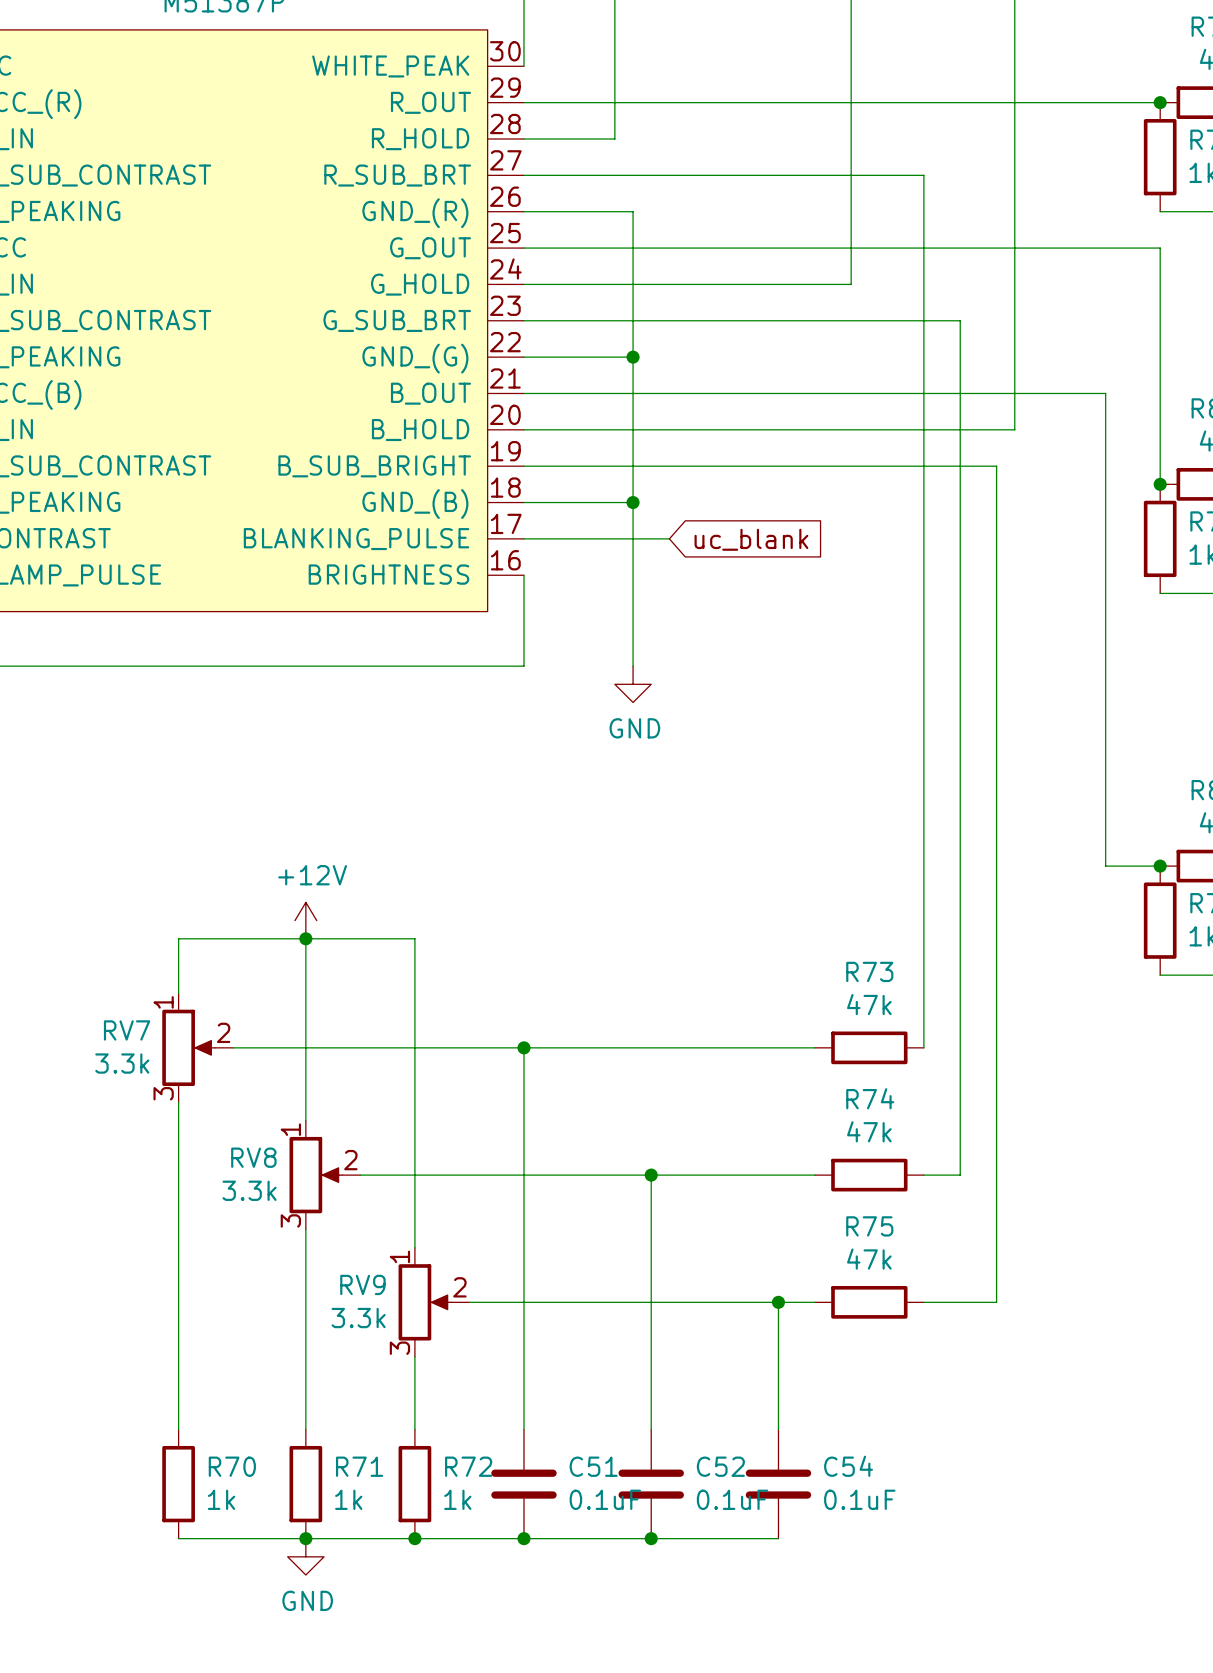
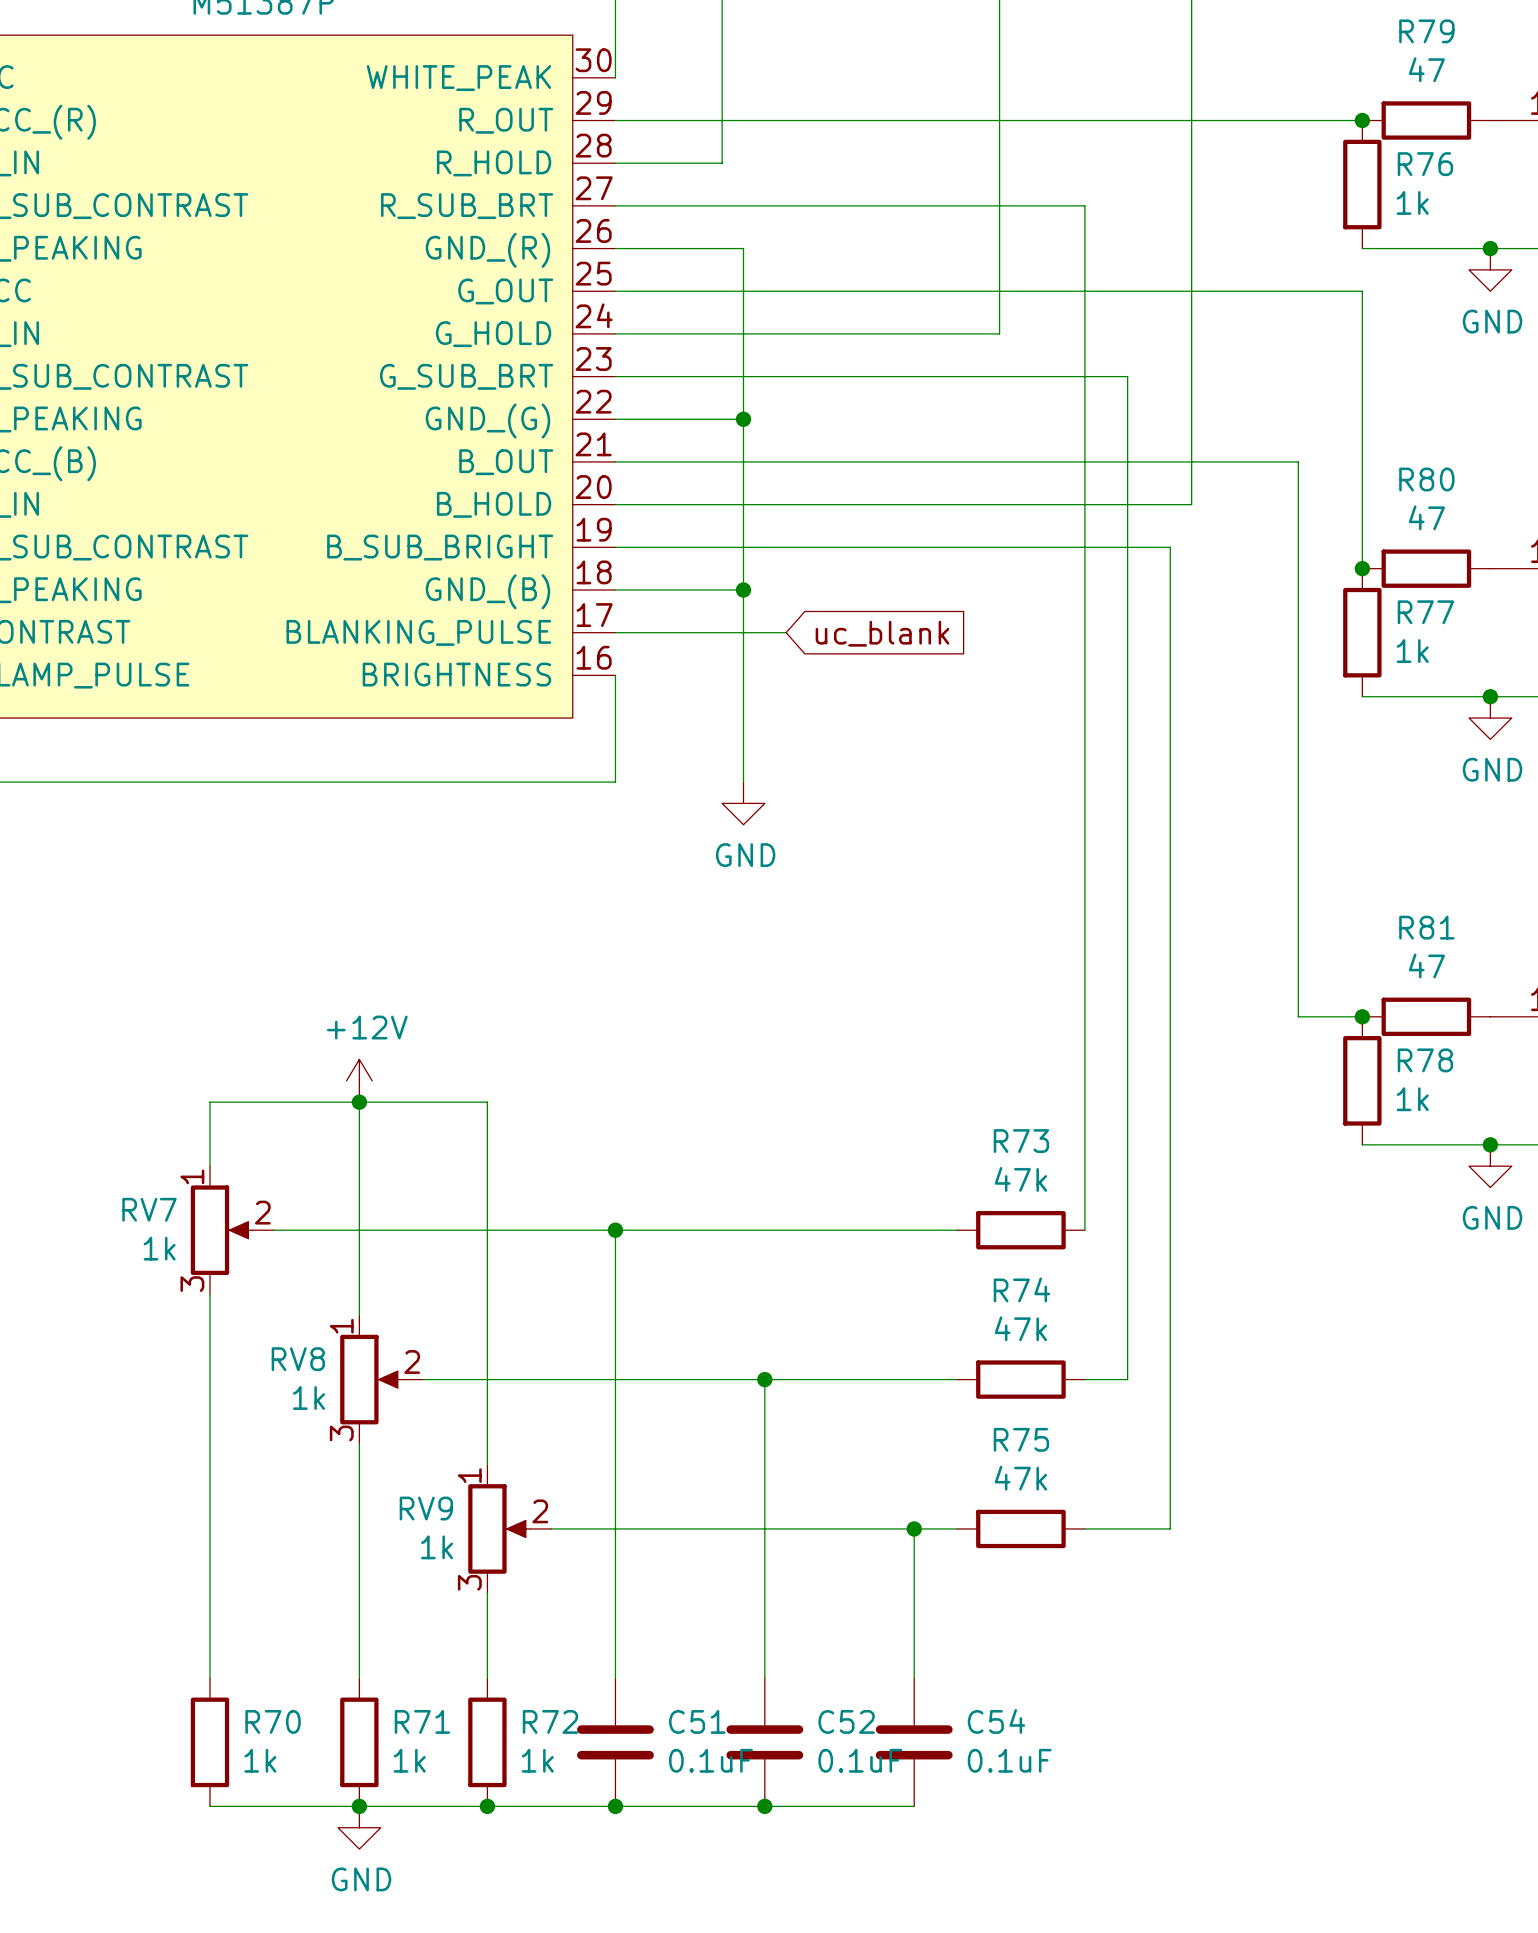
RV7 value: 3.3k (122, 1063) -> 1k (159, 1248)
RV8 value: 3.3k (249, 1190) -> 1k (309, 1398)
RV9 value: 3.3k (358, 1318) -> 1k (437, 1547)

